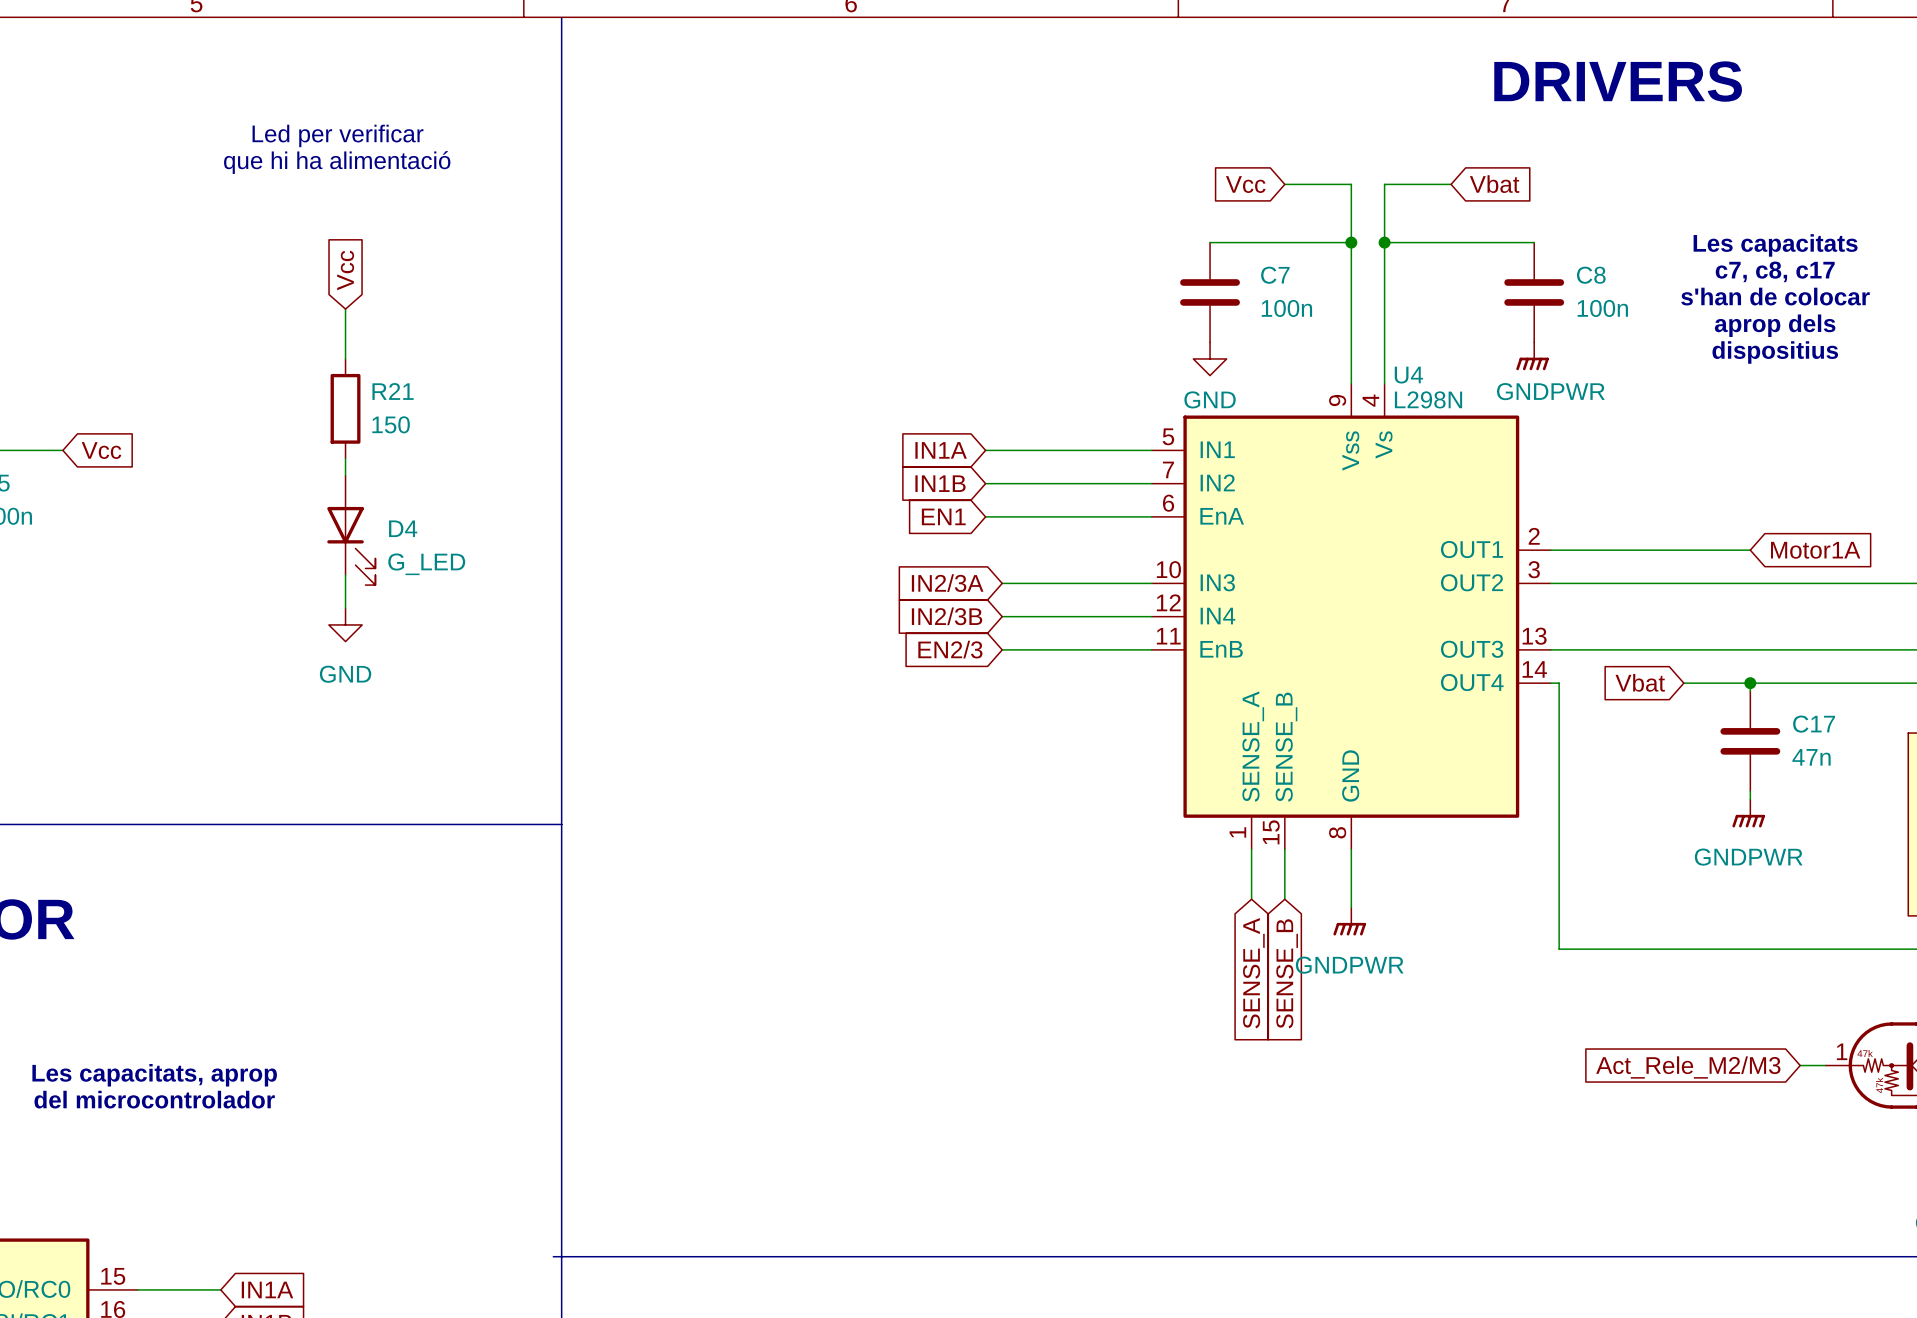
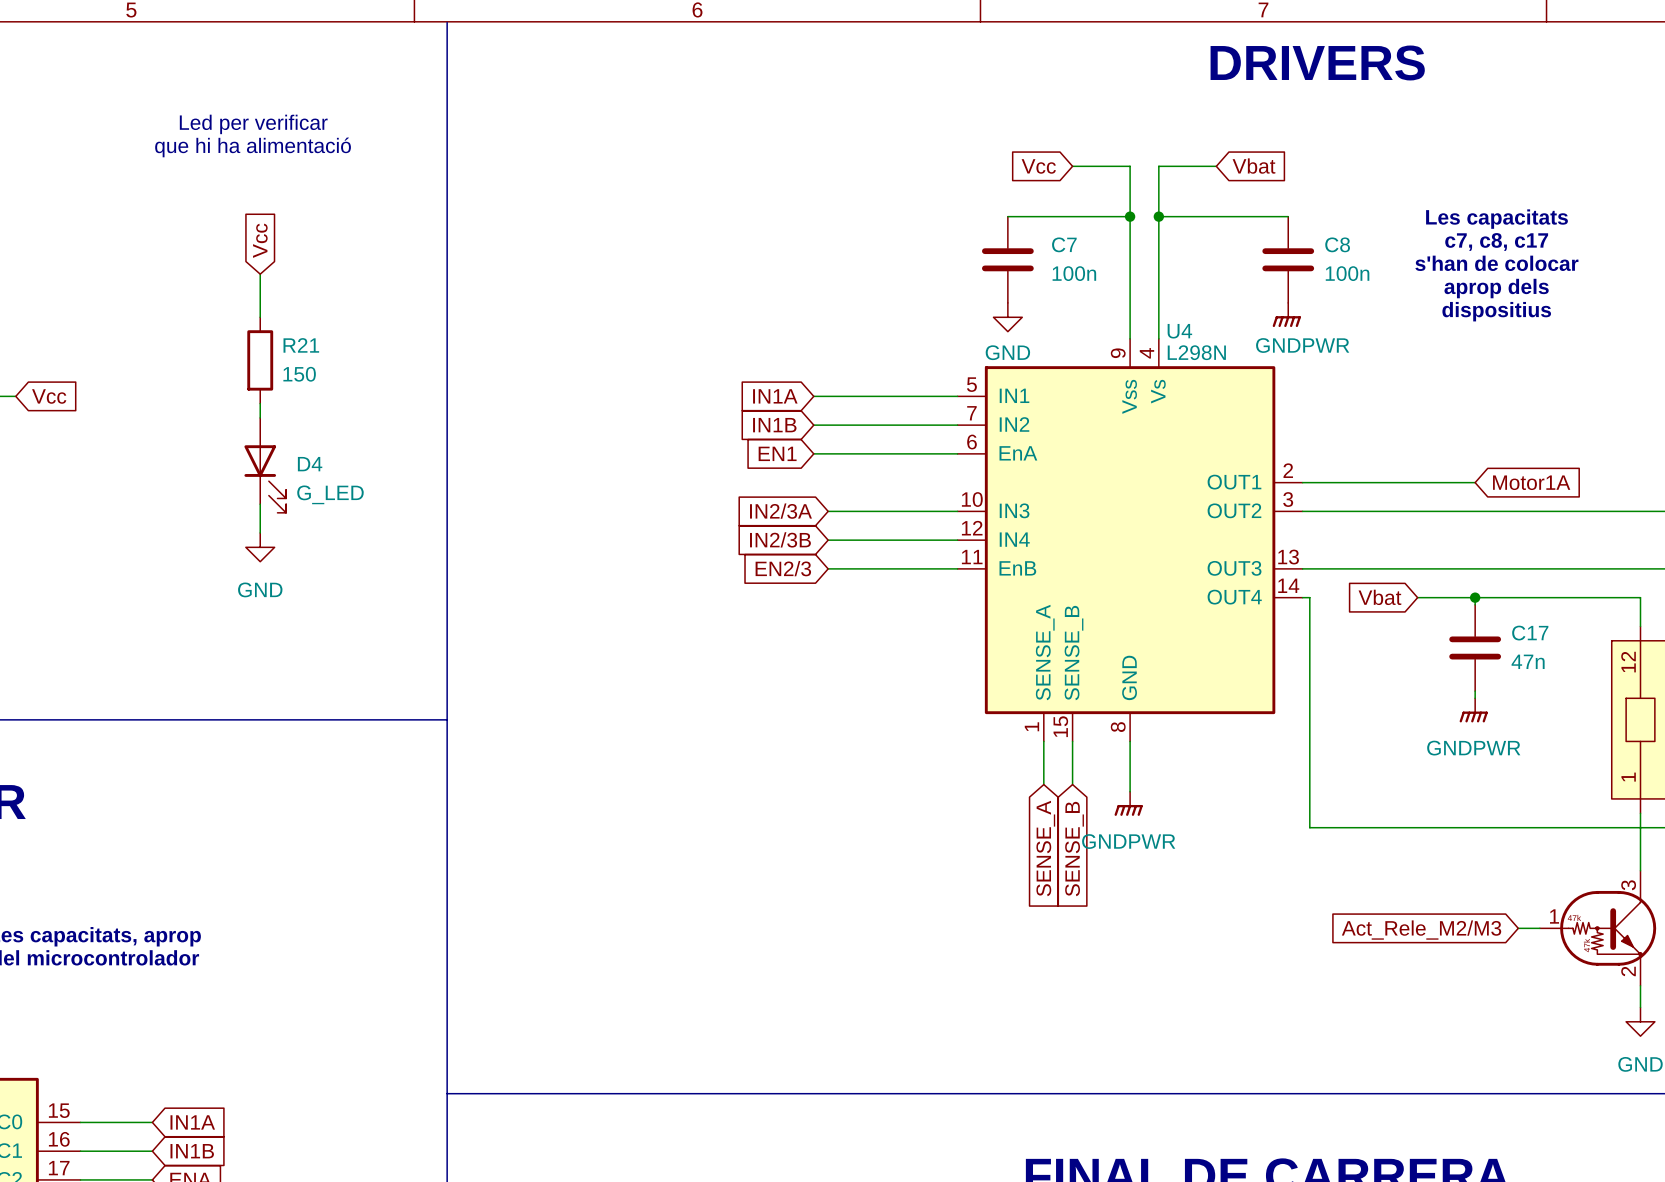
text position: DRIVERS (1618, 81) -> DRIVERS (1317, 62)
line: (553, 1256) (561, 1256) -> none

